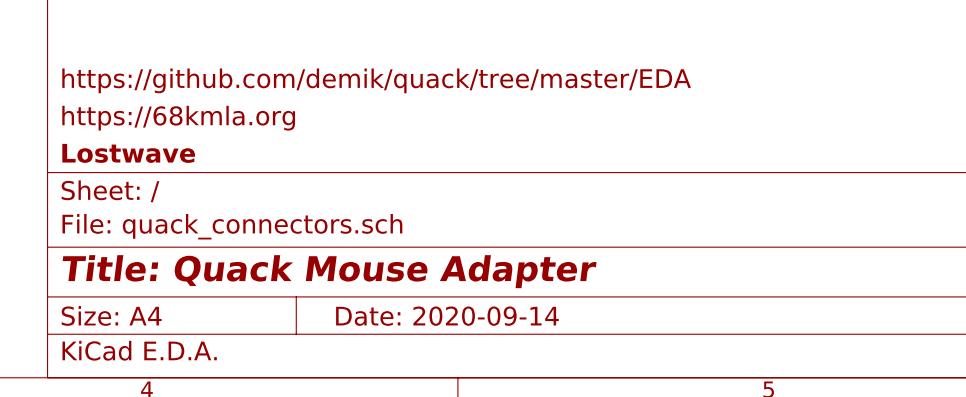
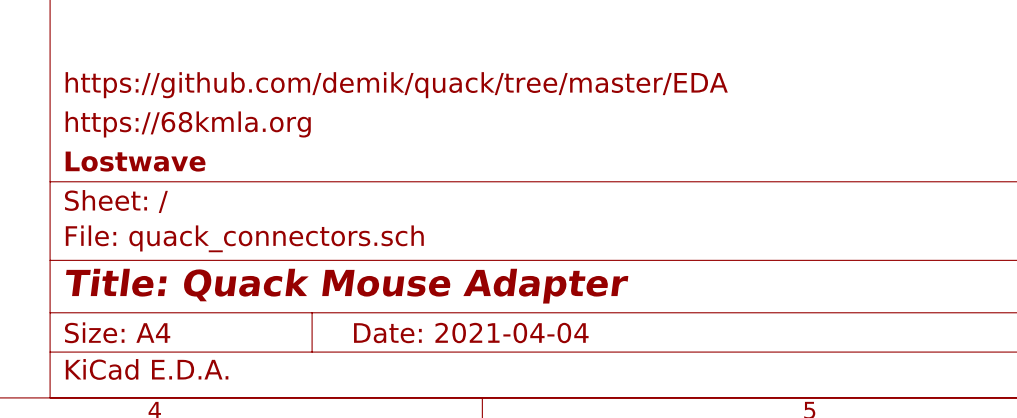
title block: Date: 2020-09-14 (447, 316) -> Date: 2021-04-04 (471, 333)

